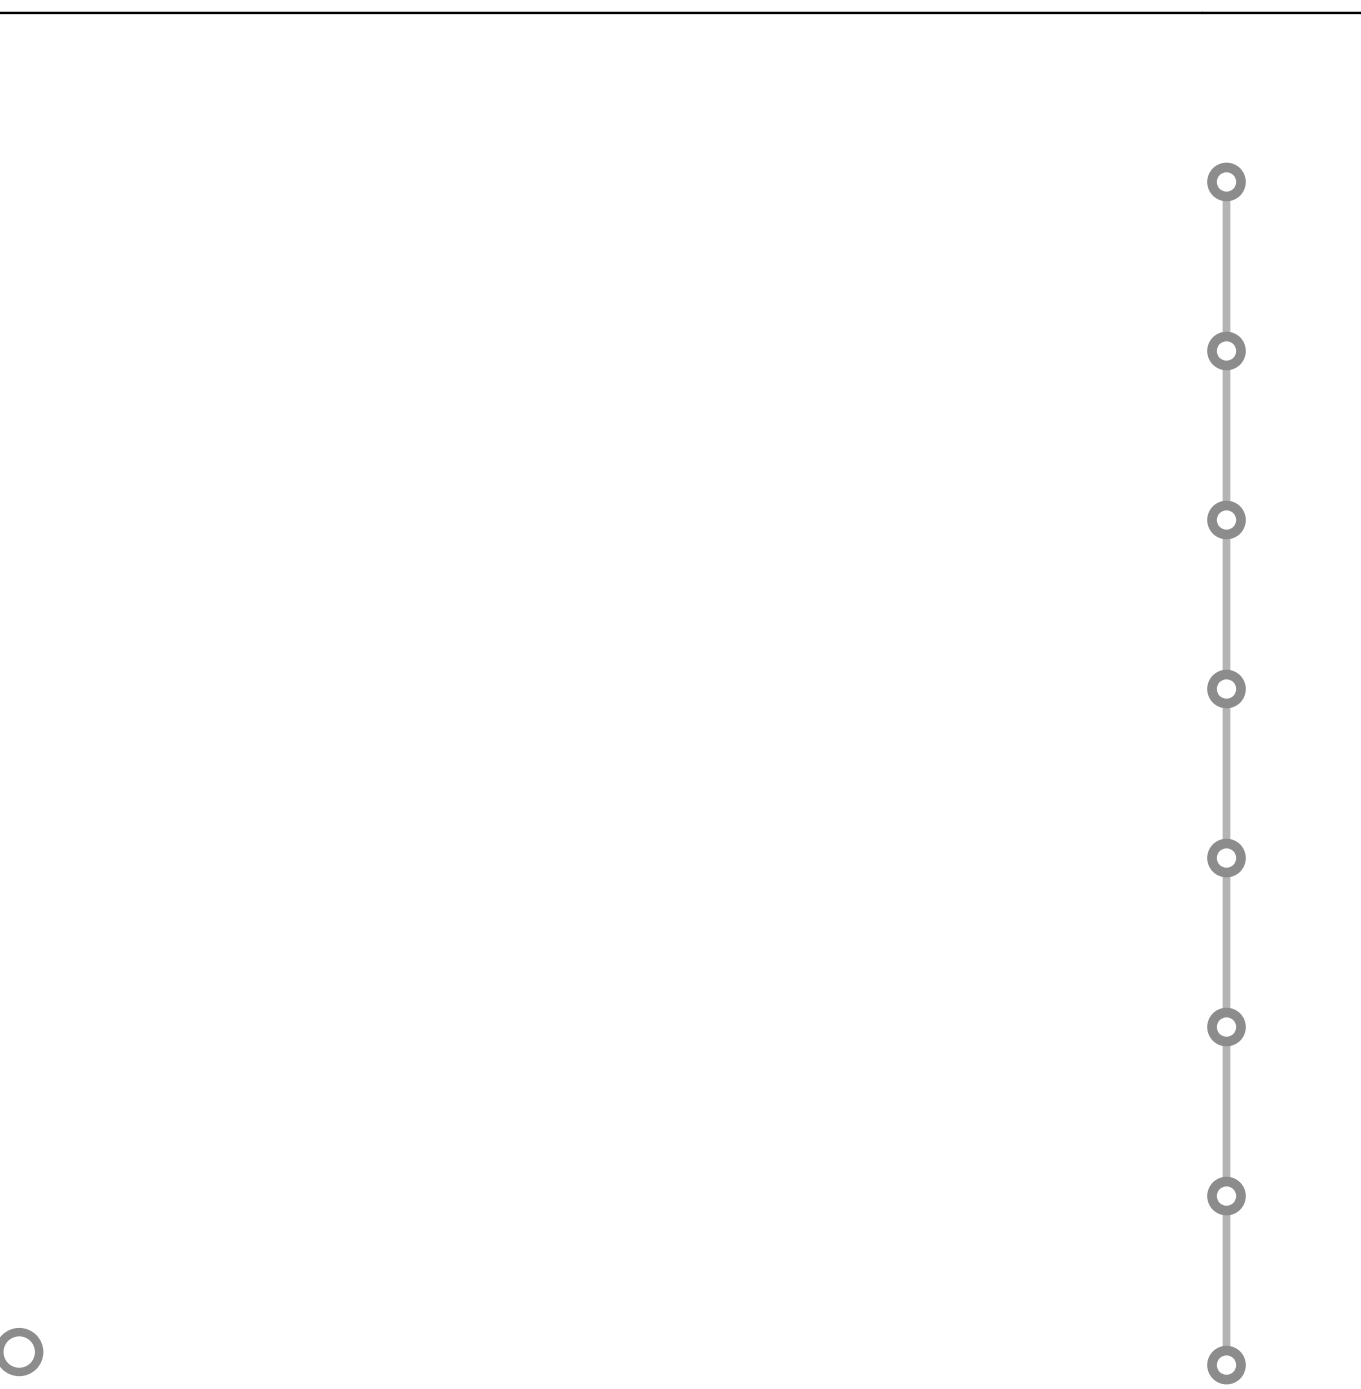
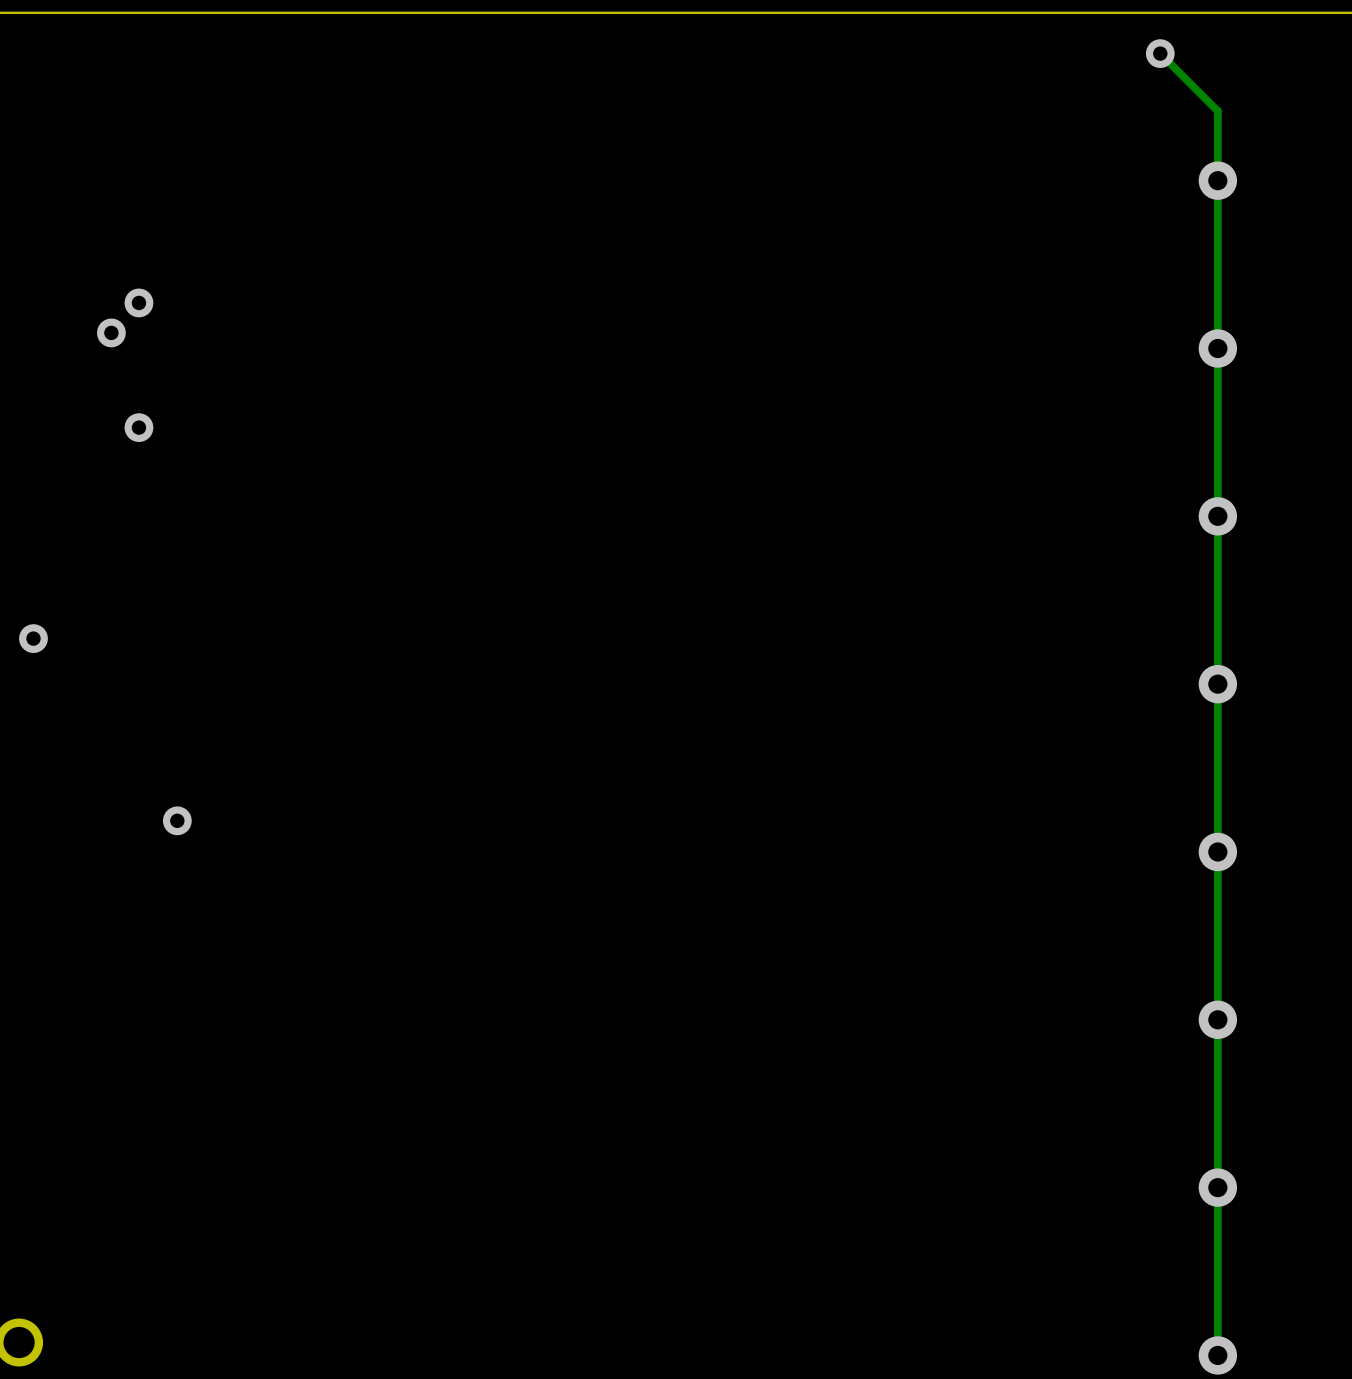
track: none -> (1160, 53) (1217, 111) (1217, 180)
via: none -> (1160, 53)
via: none -> (138, 302)
via: none -> (111, 332)
via: none -> (138, 427)
via: none -> (33, 638)
via: none -> (177, 820)

